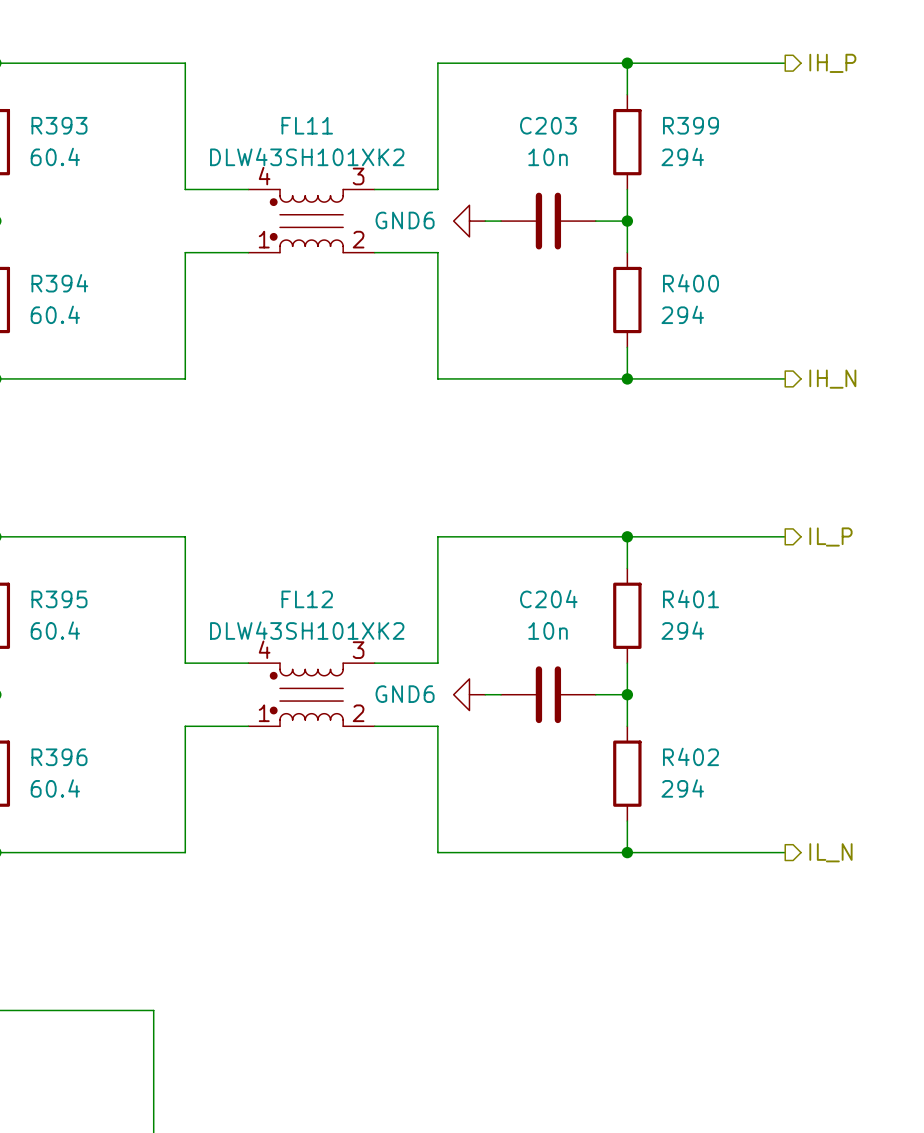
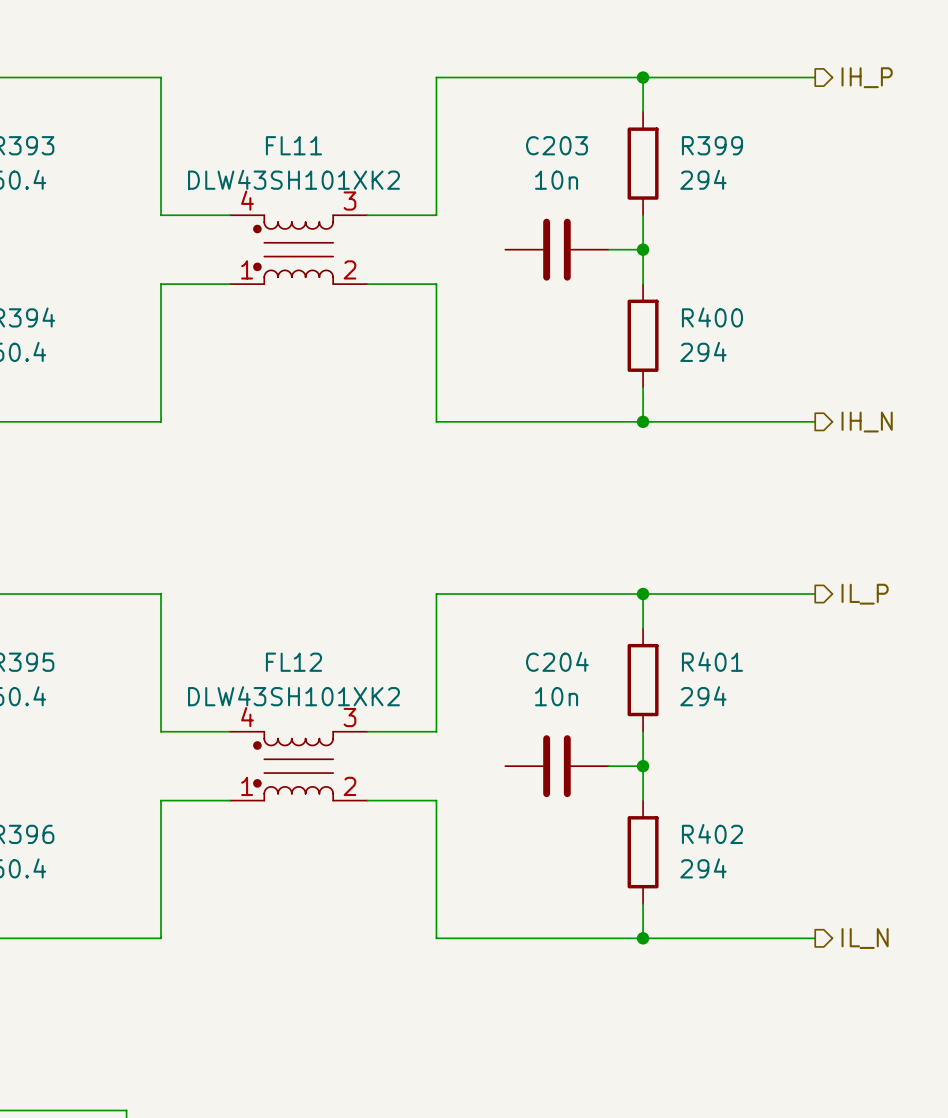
power symbol: GND6 (469, 221) -> none
wire: (485, 221) (501, 221) -> none
power symbol: GND6 (469, 694) -> none
wire: (485, 694) (501, 694) -> none

